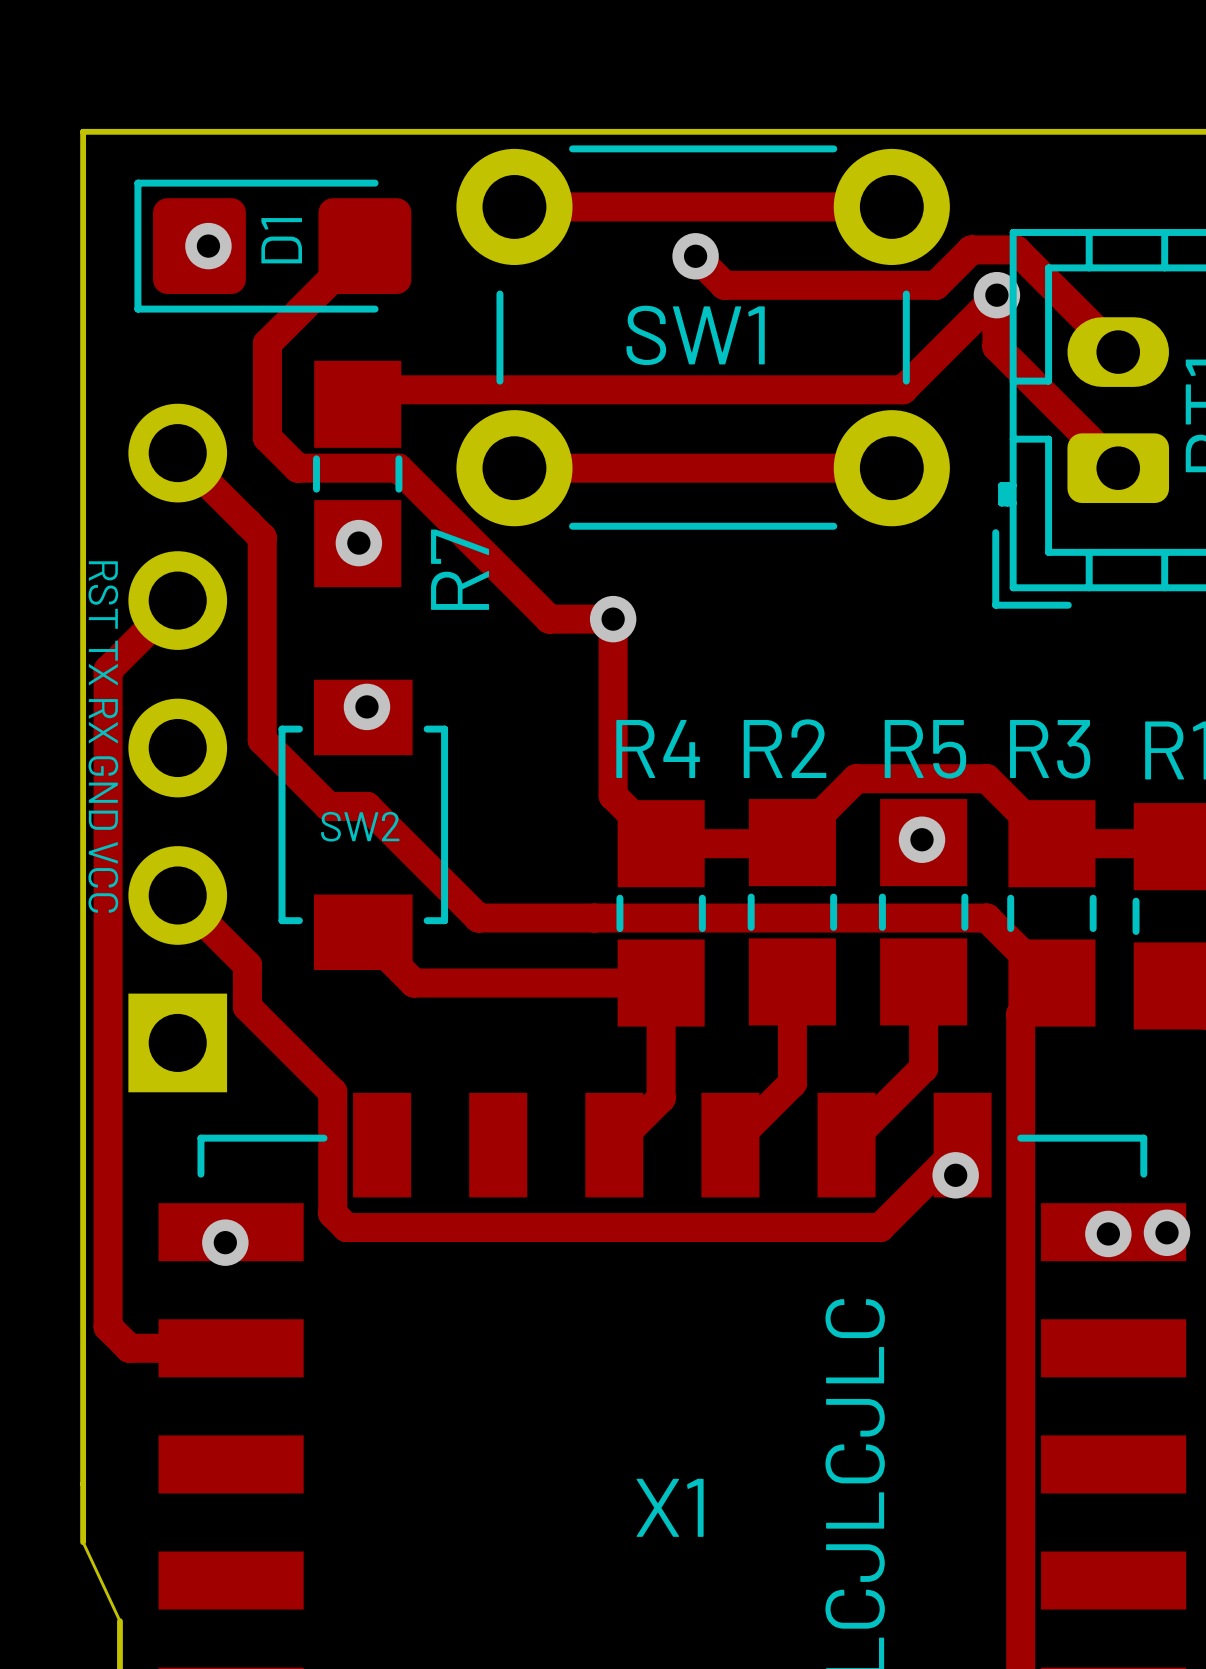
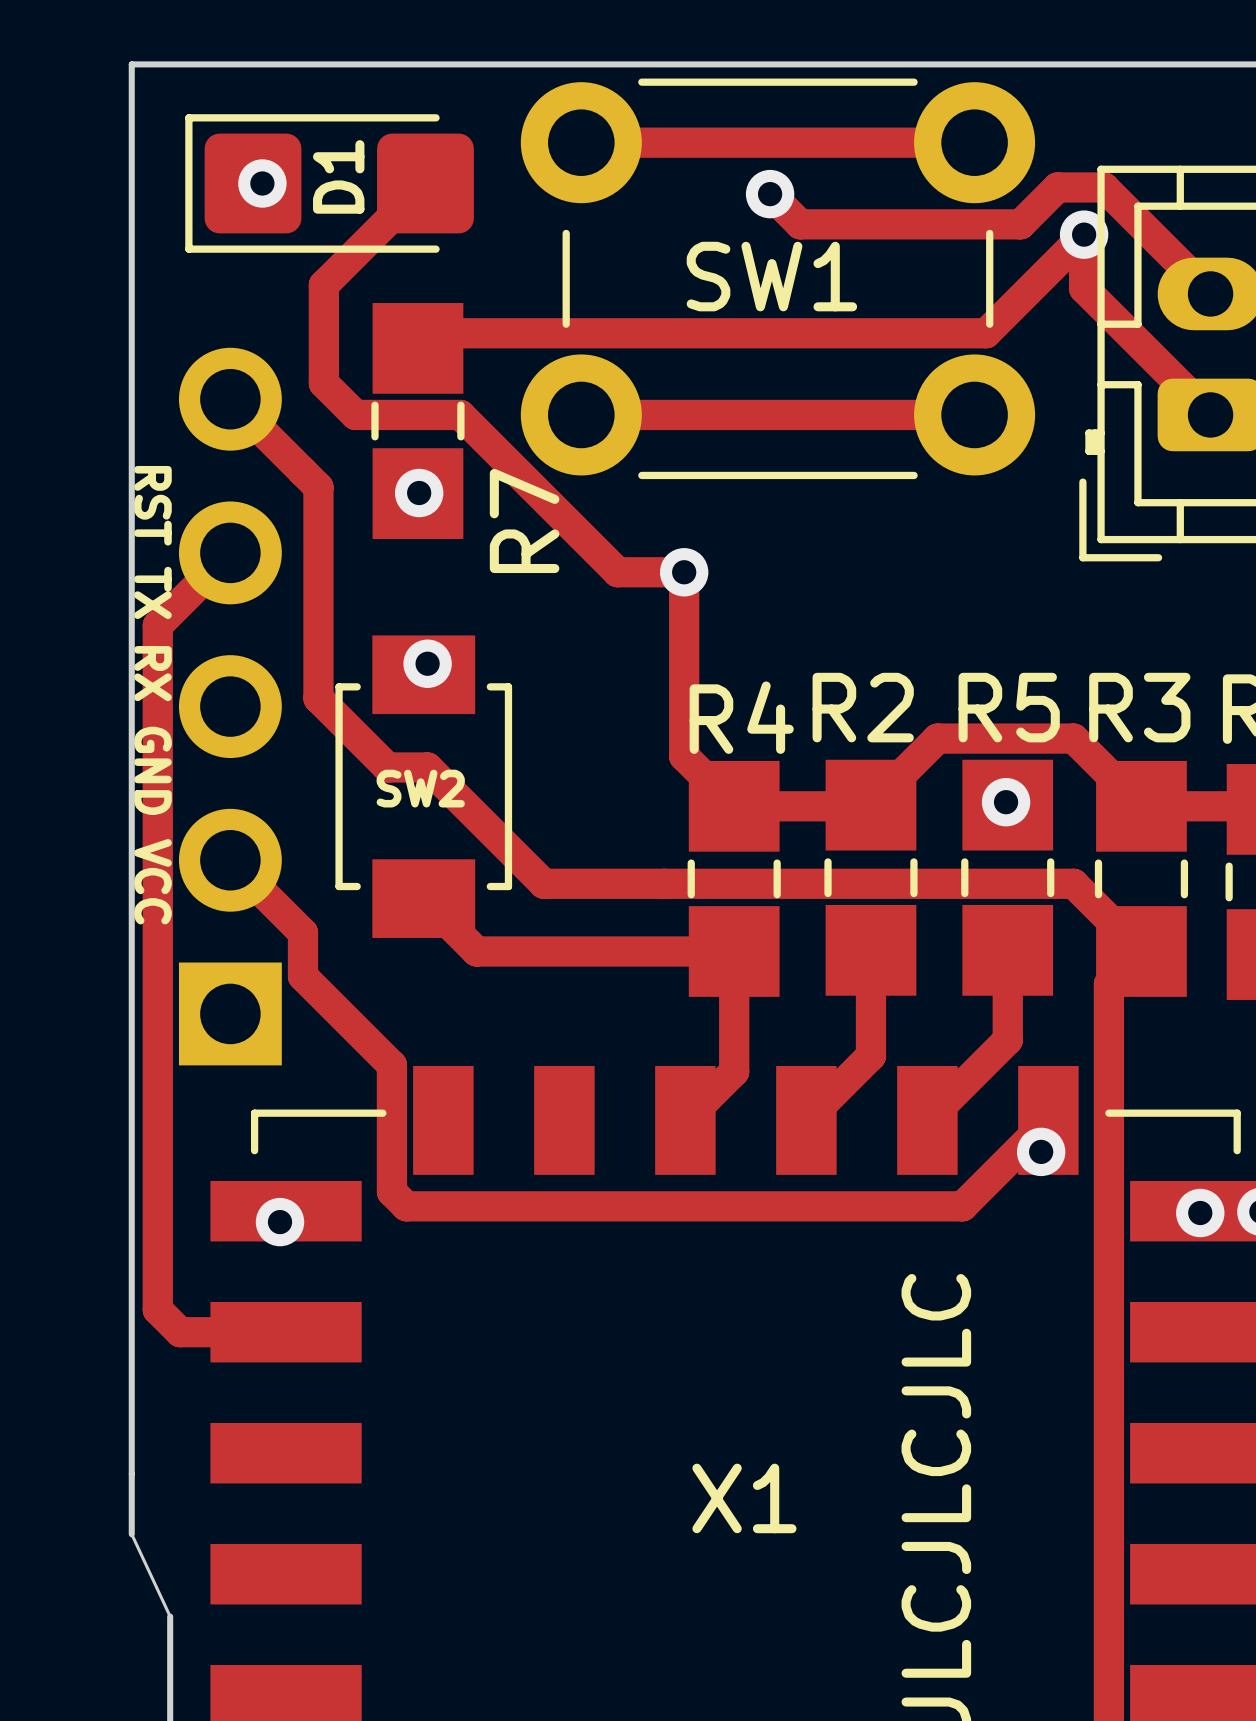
R4 name position: R4 (658, 748) -> R4 (741, 717)

